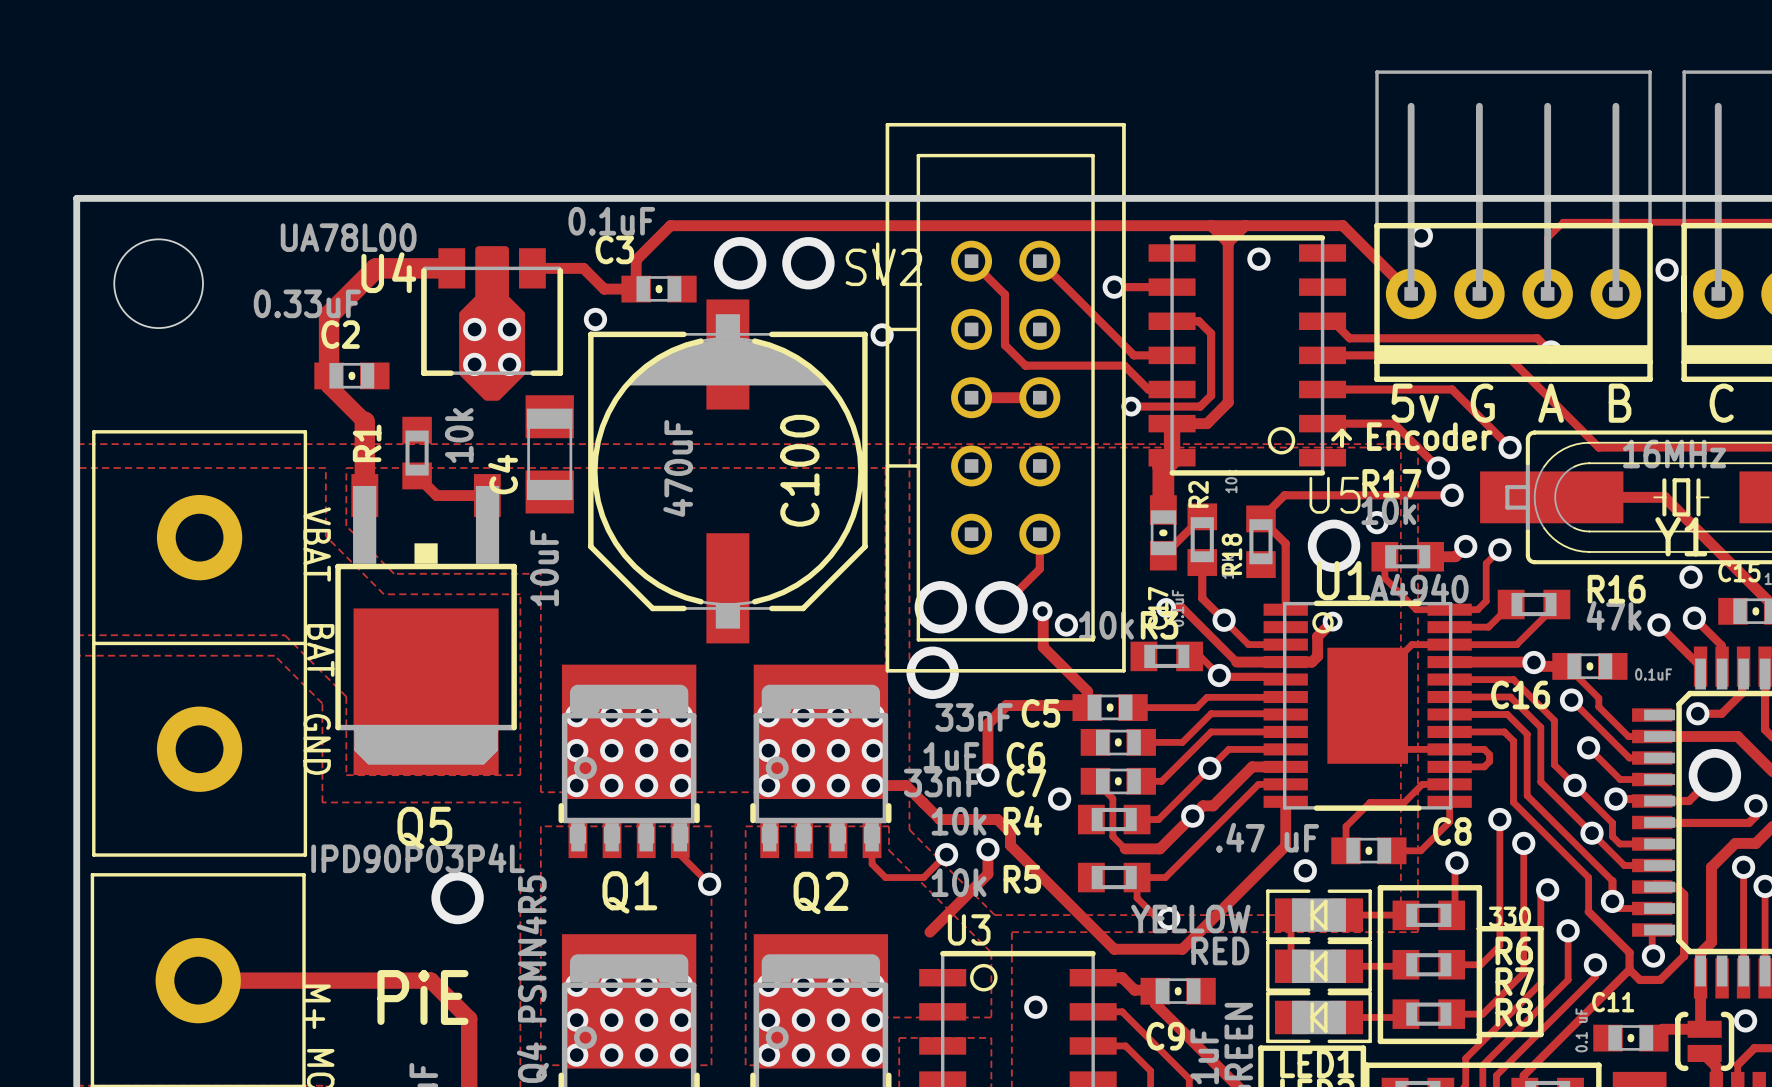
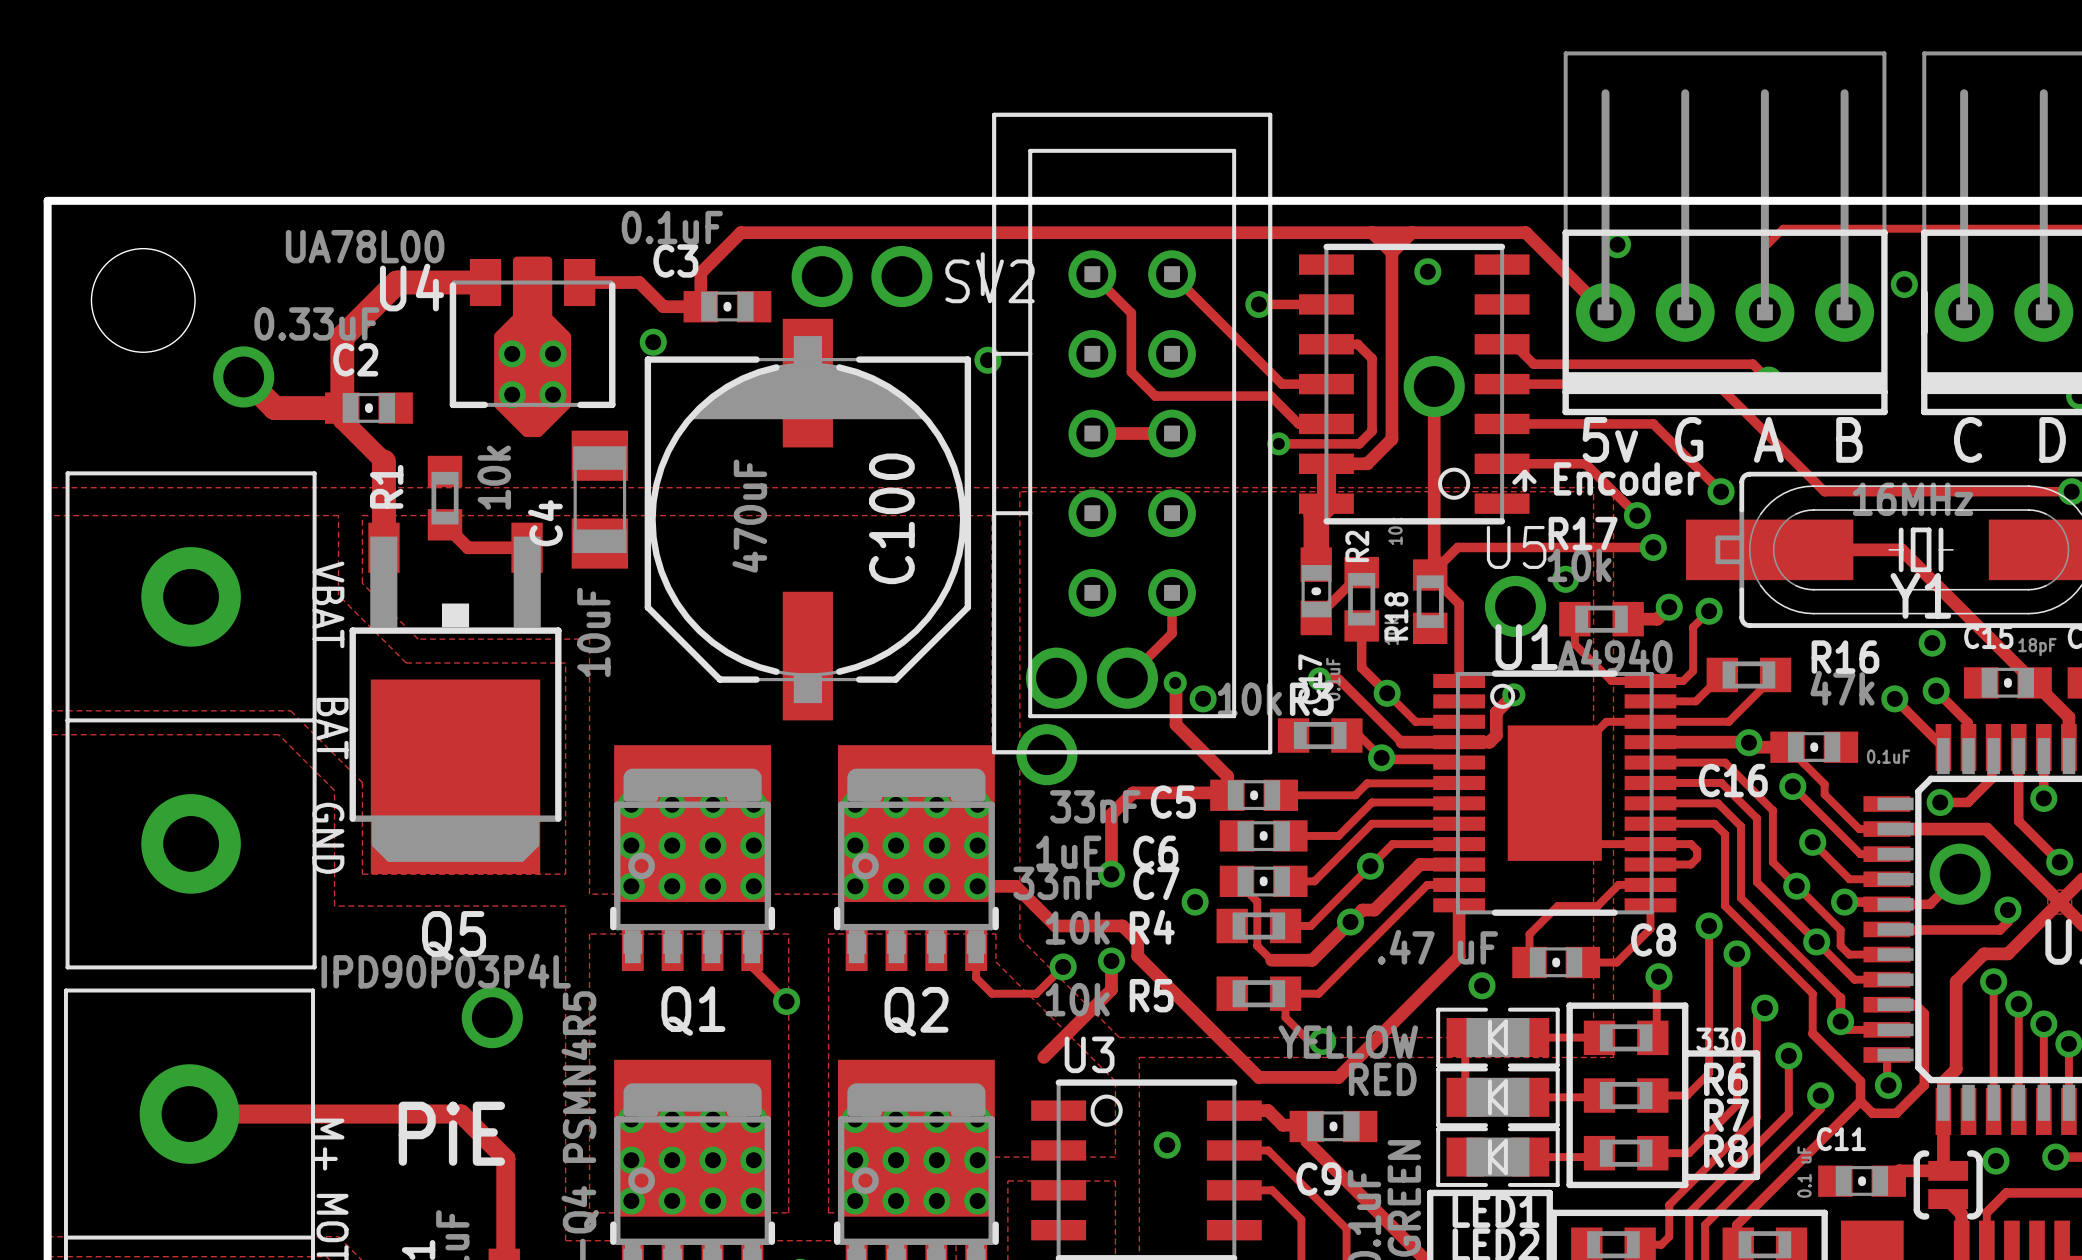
track: none -> (243, 376) (274, 408) (342, 408)
via: none -> (243, 376)
track: none -> (1434, 386) (1434, 558) (1438, 563) (1434, 563) (1434, 571) (1430, 574)
via: none -> (1434, 386)

